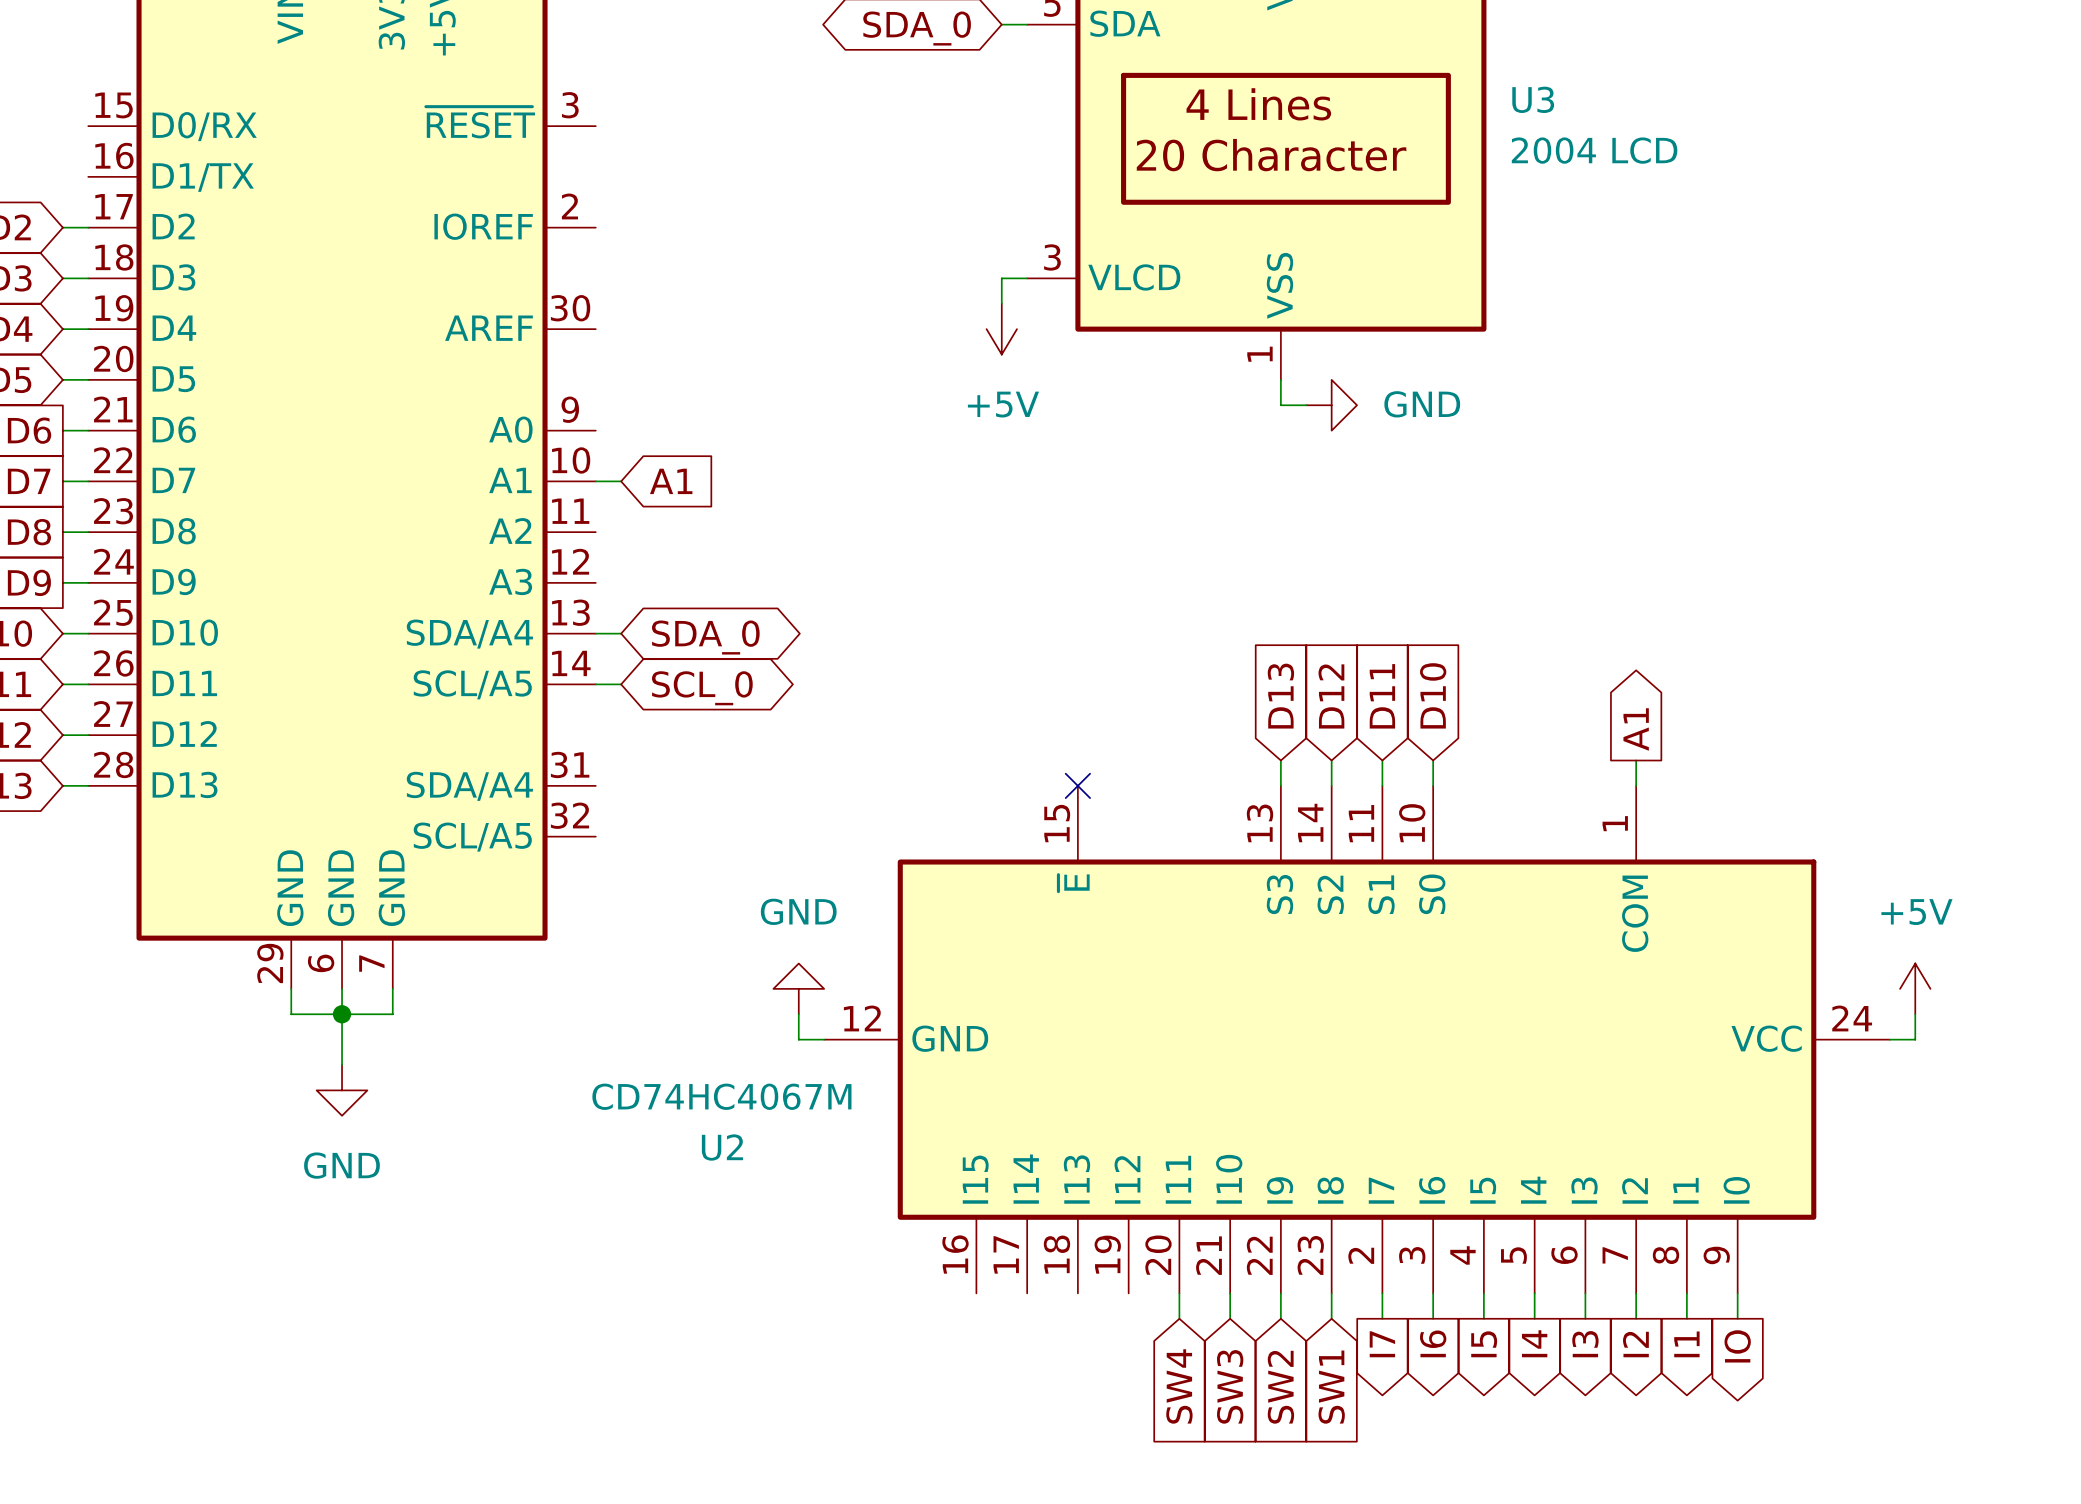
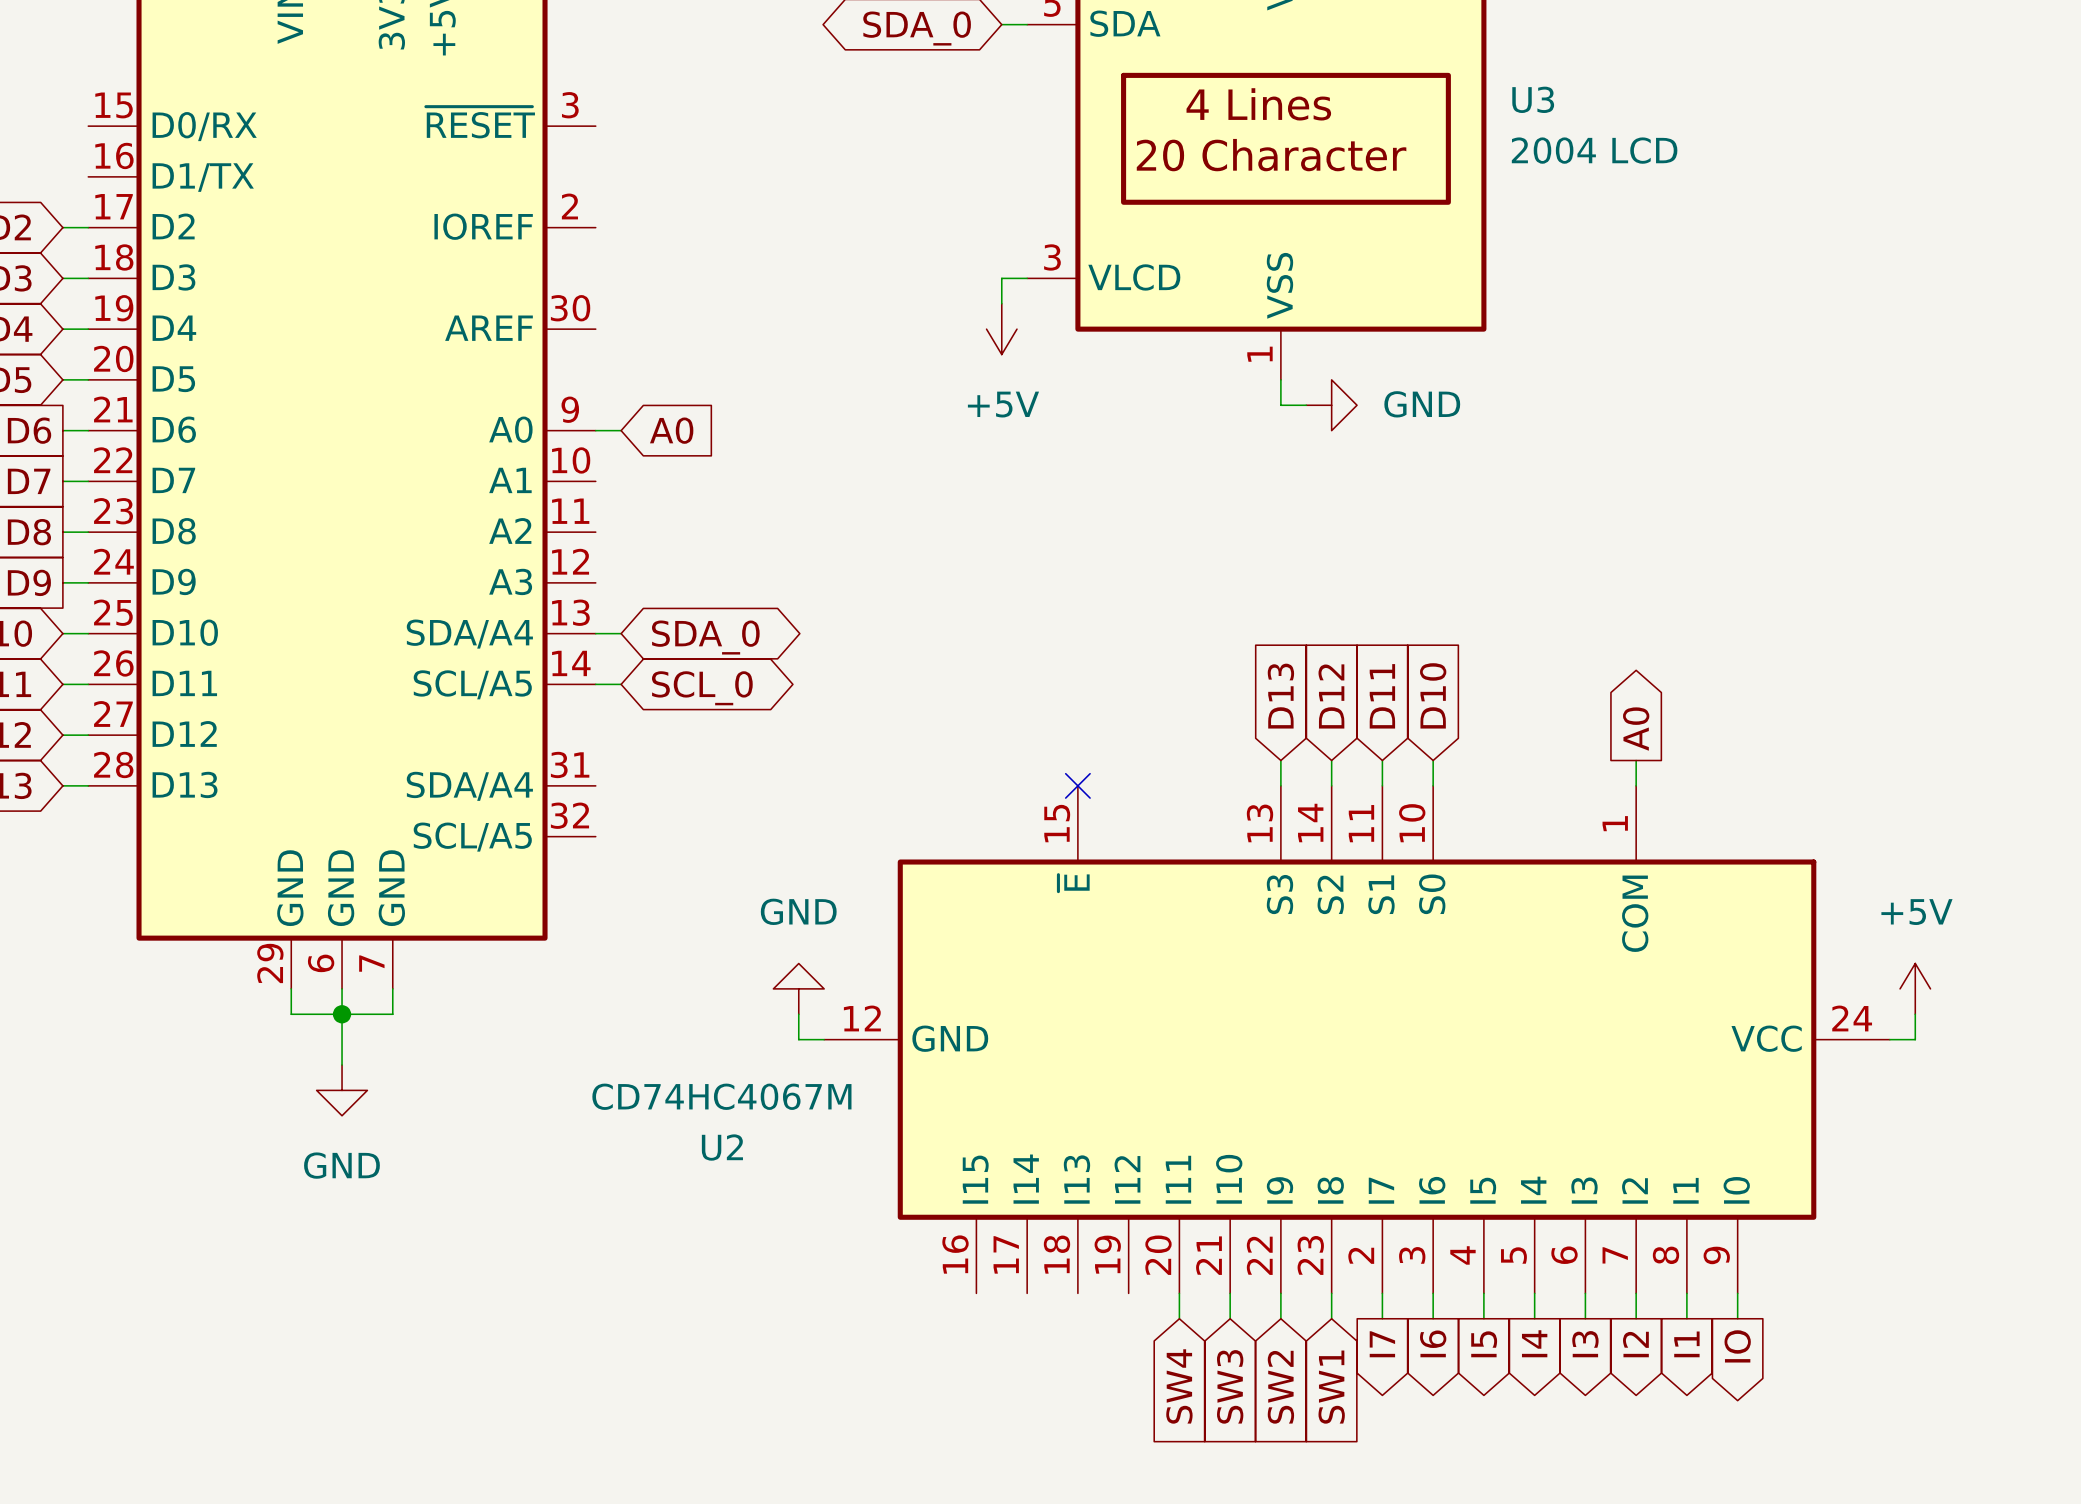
global label: none -> A0 (671, 430)
wire: (595, 481) (621, 481) -> (595, 430) (621, 430)
global label: A1 (671, 481) -> none
global label: A1 (1636, 729) -> A0 (1636, 729)

